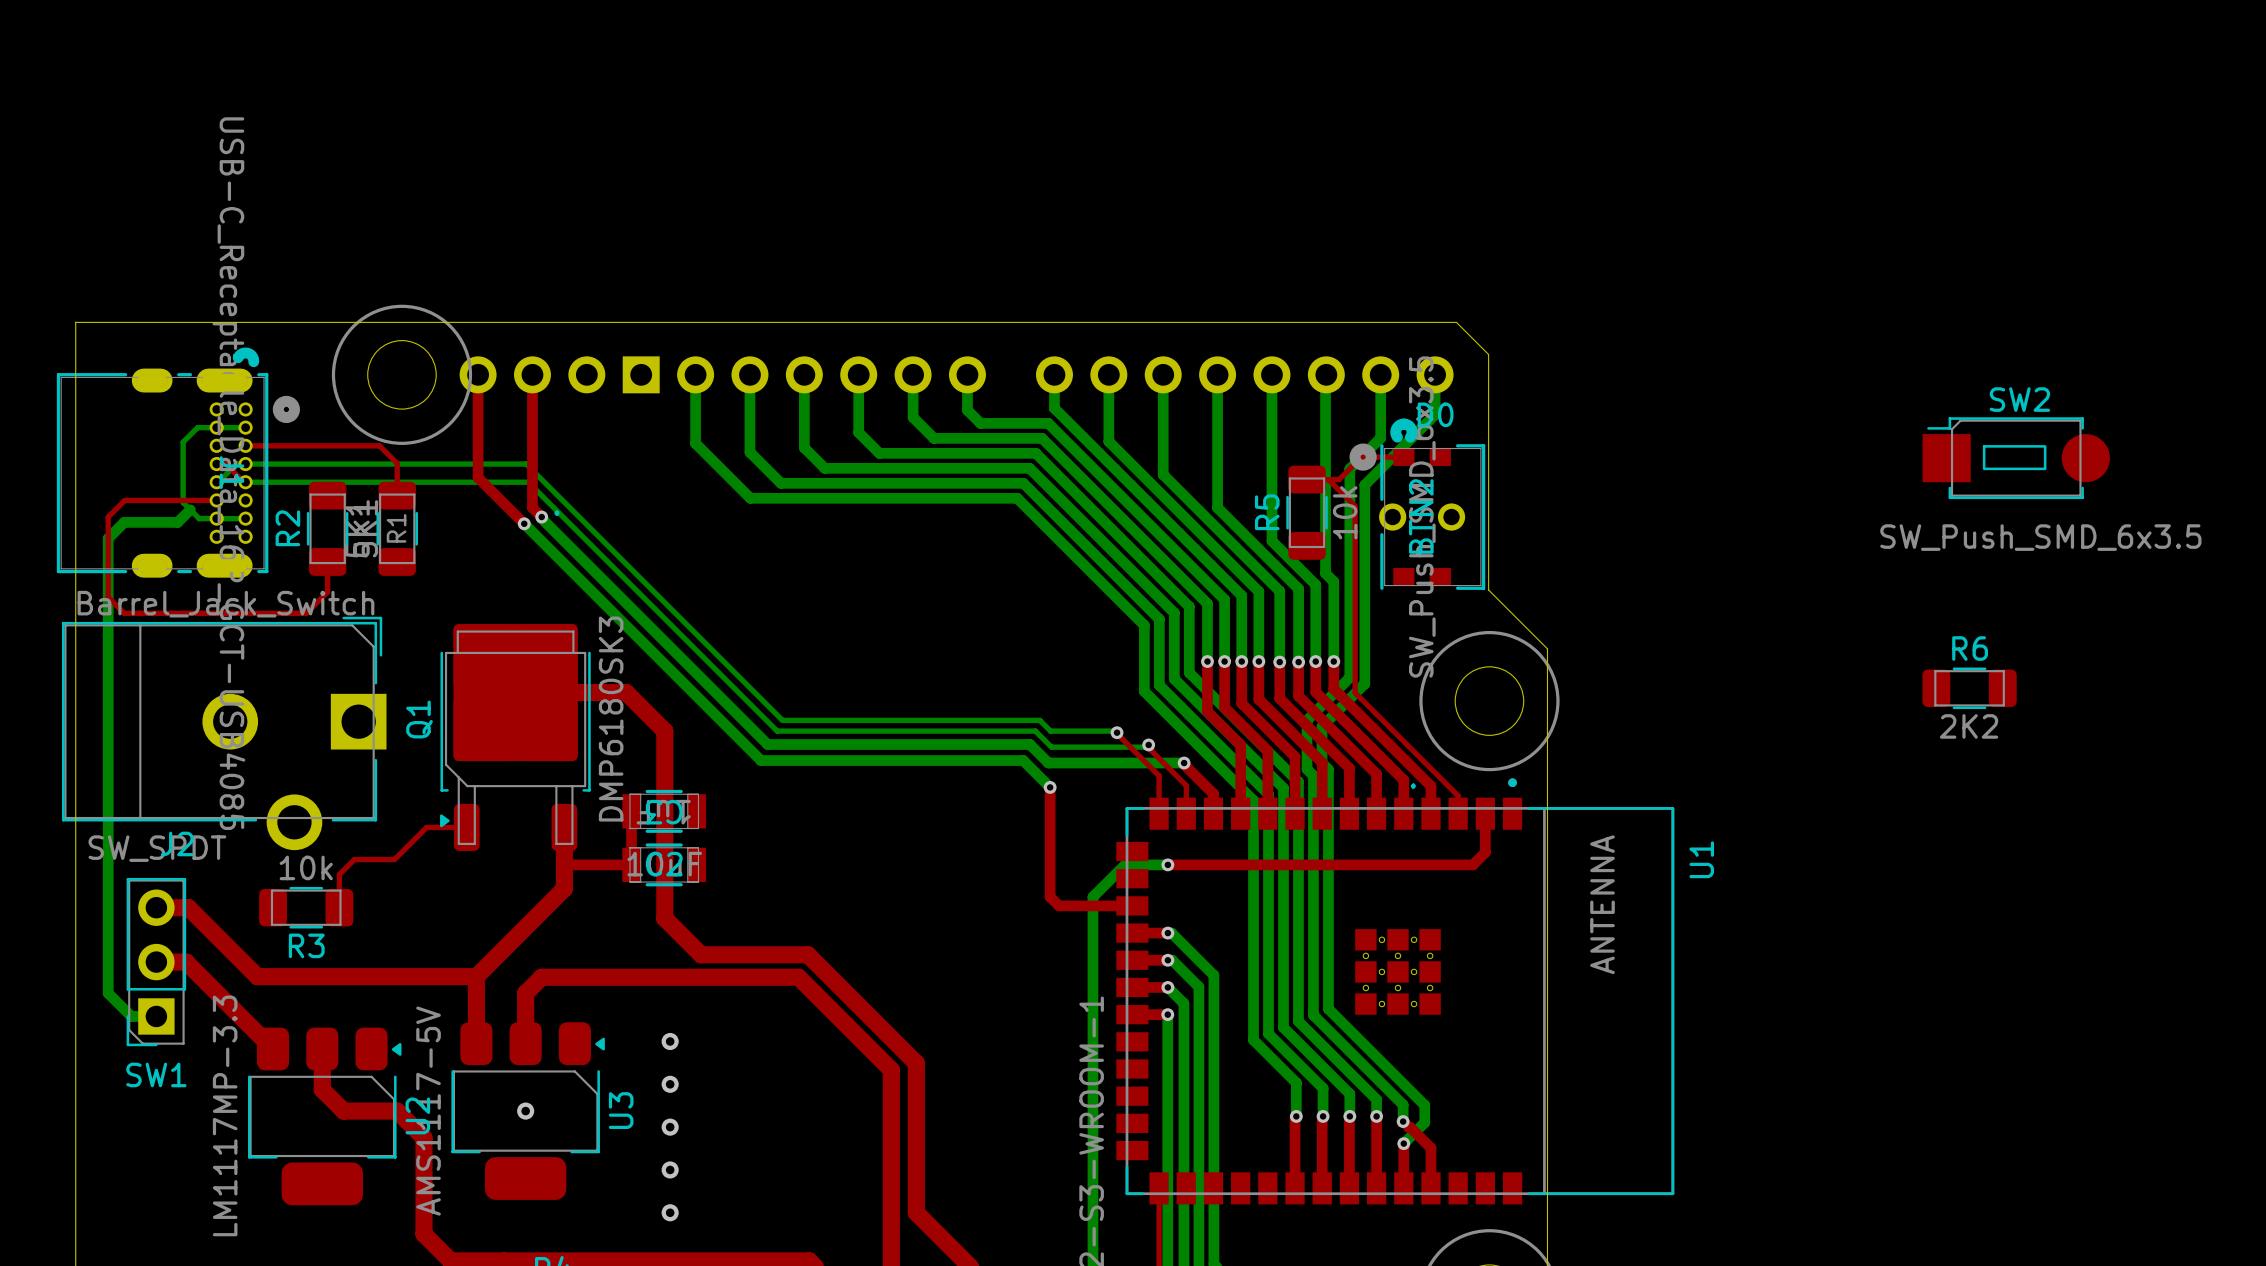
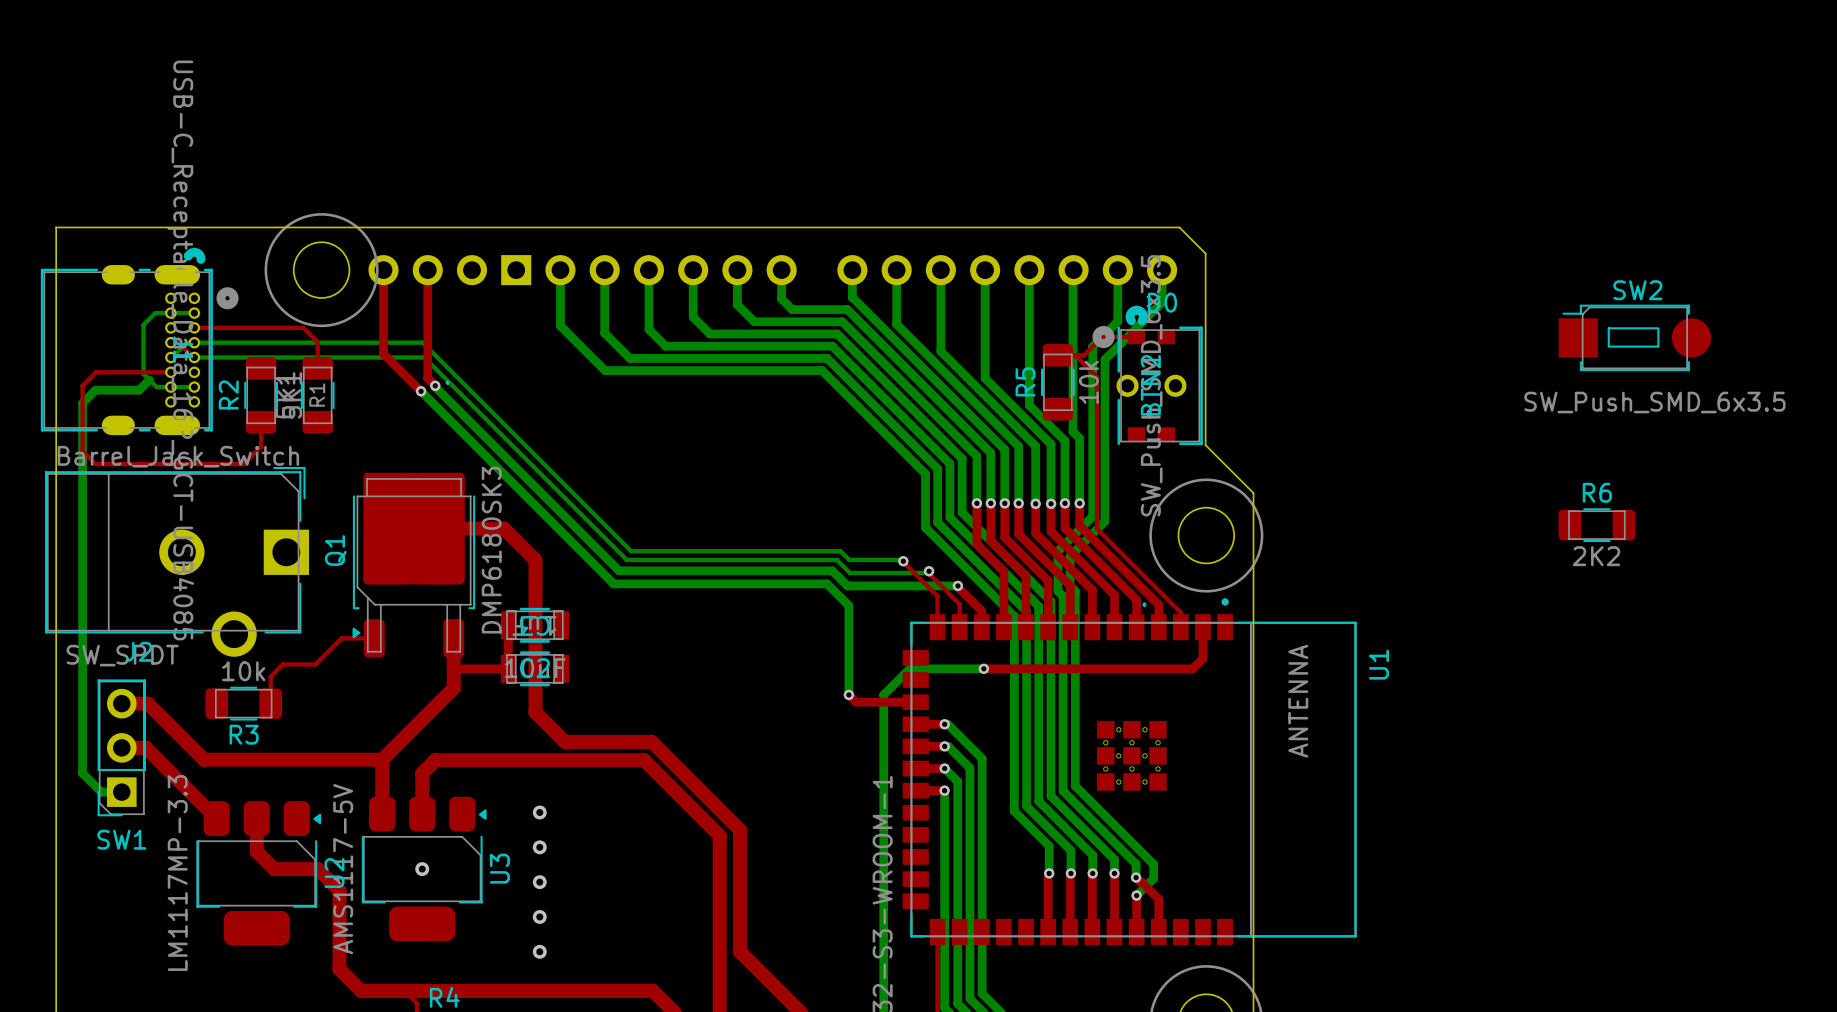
top track: (1050, 787) (1050, 897) -> none
bottom track: none -> (848, 605) (848, 694)
via: (1050, 787) -> none
top track: (1167, 864) (1216, 864) -> none
bottom track: none -> (944, 668) (983, 668)
via position: (1167, 864) -> (983, 668)
via: none -> (848, 694)

